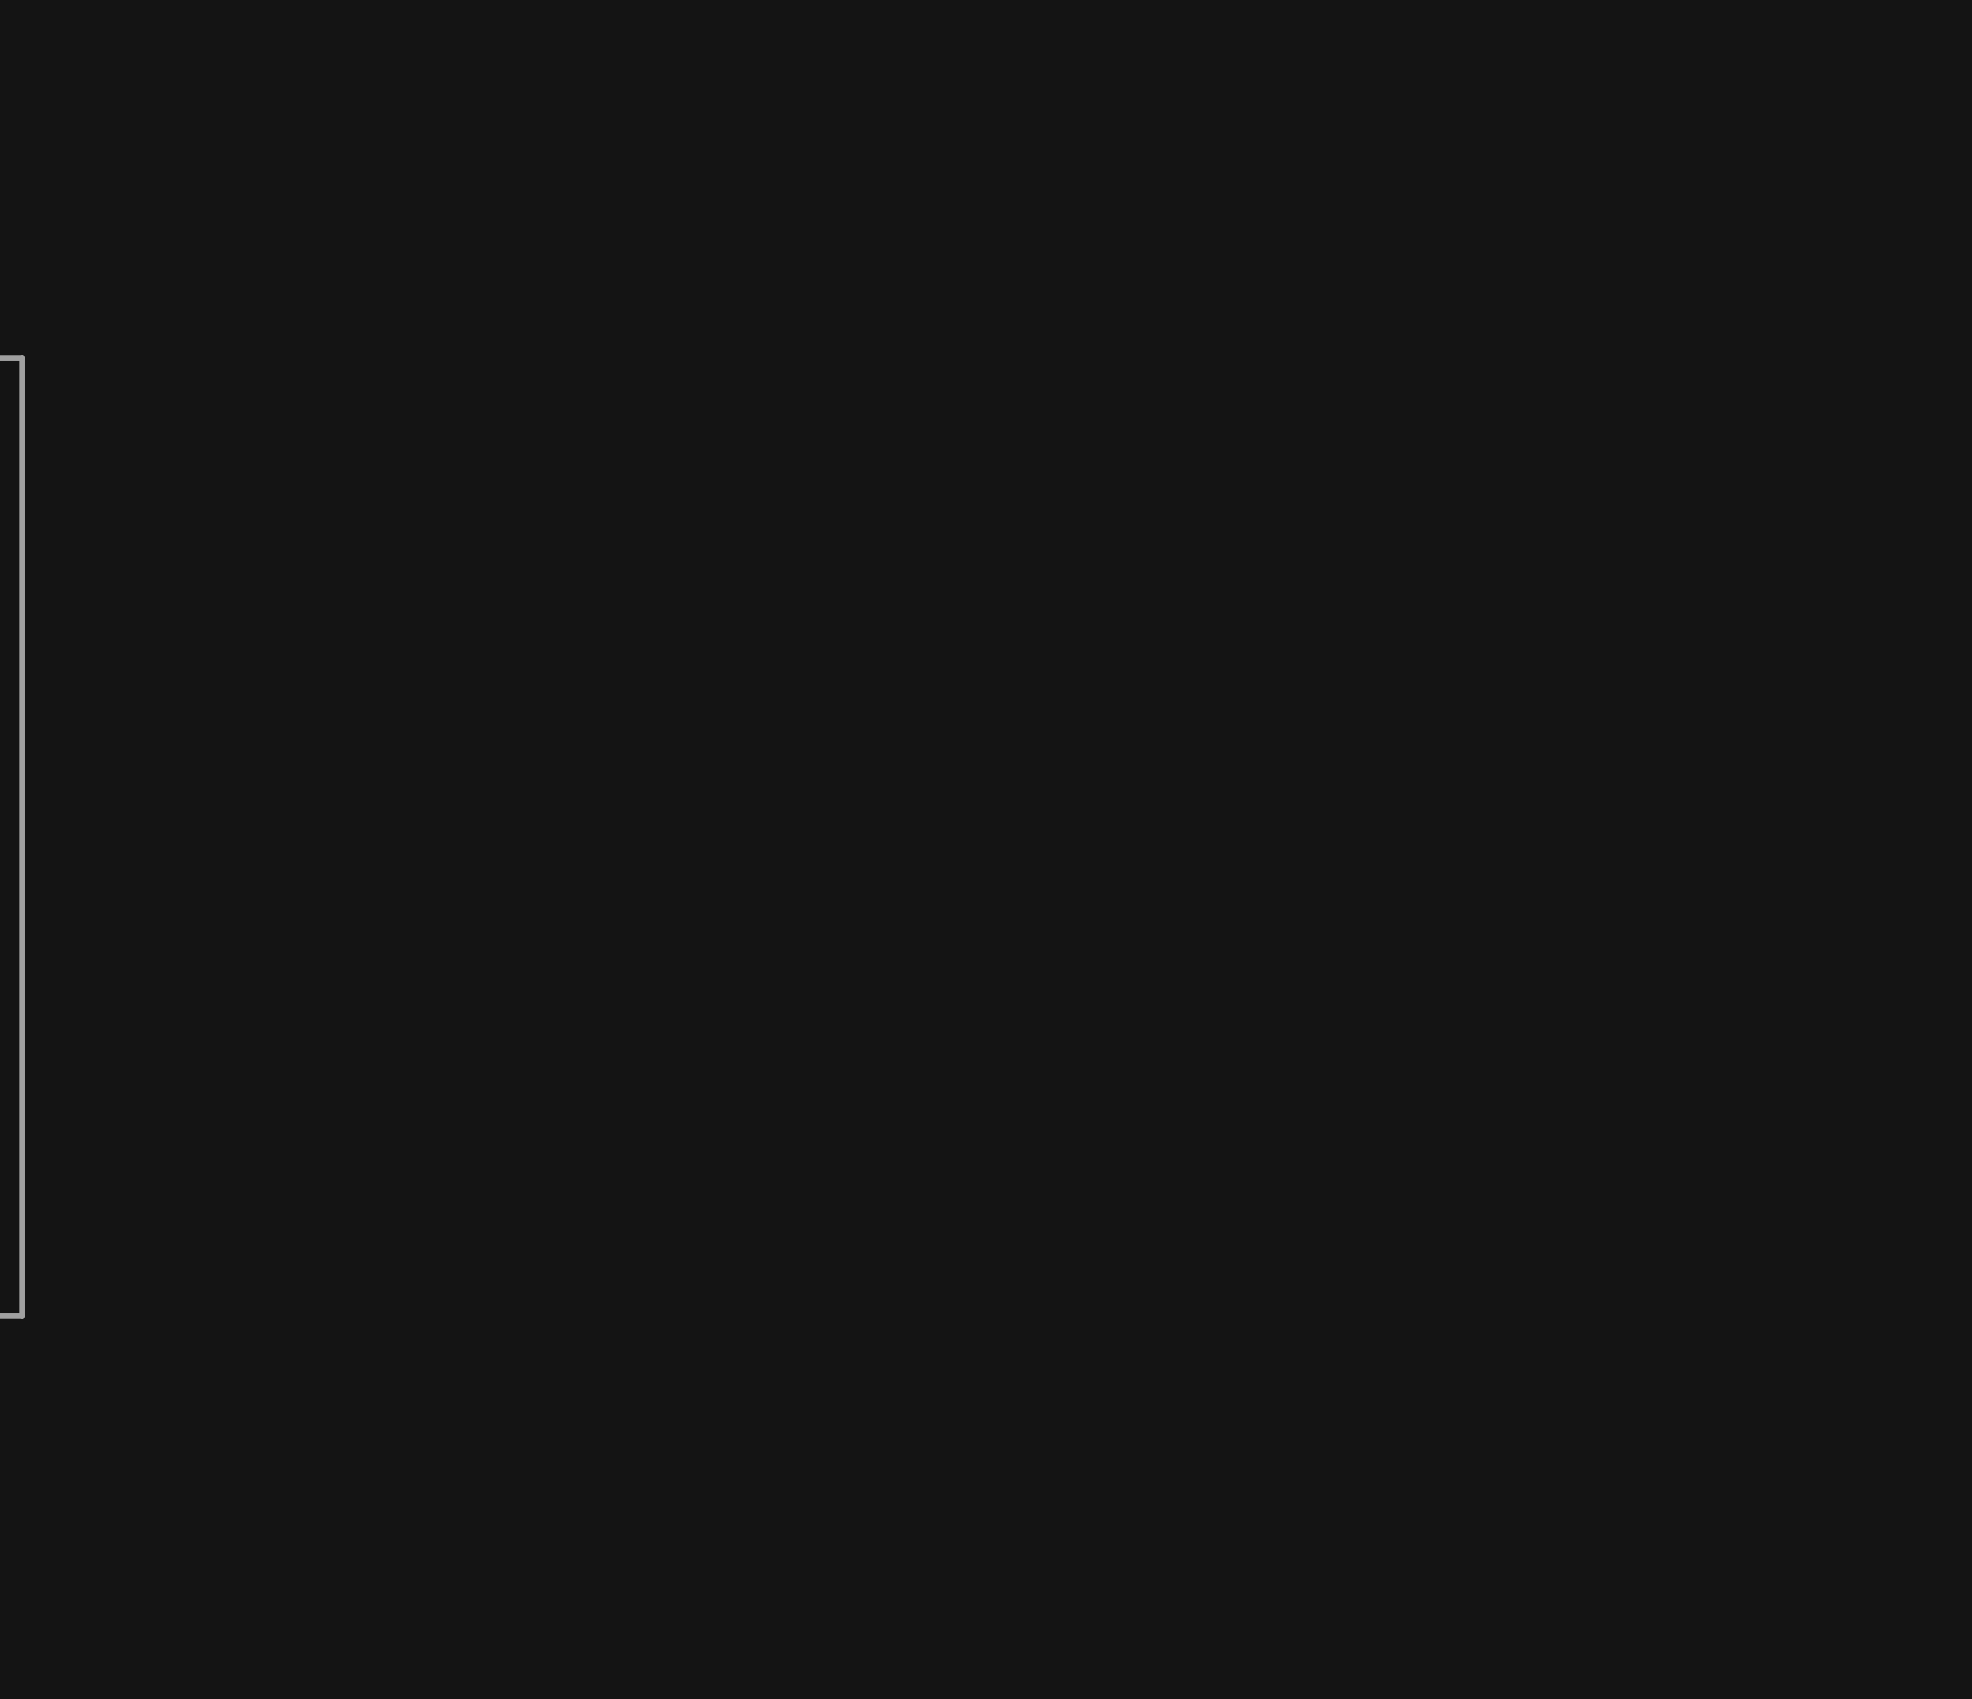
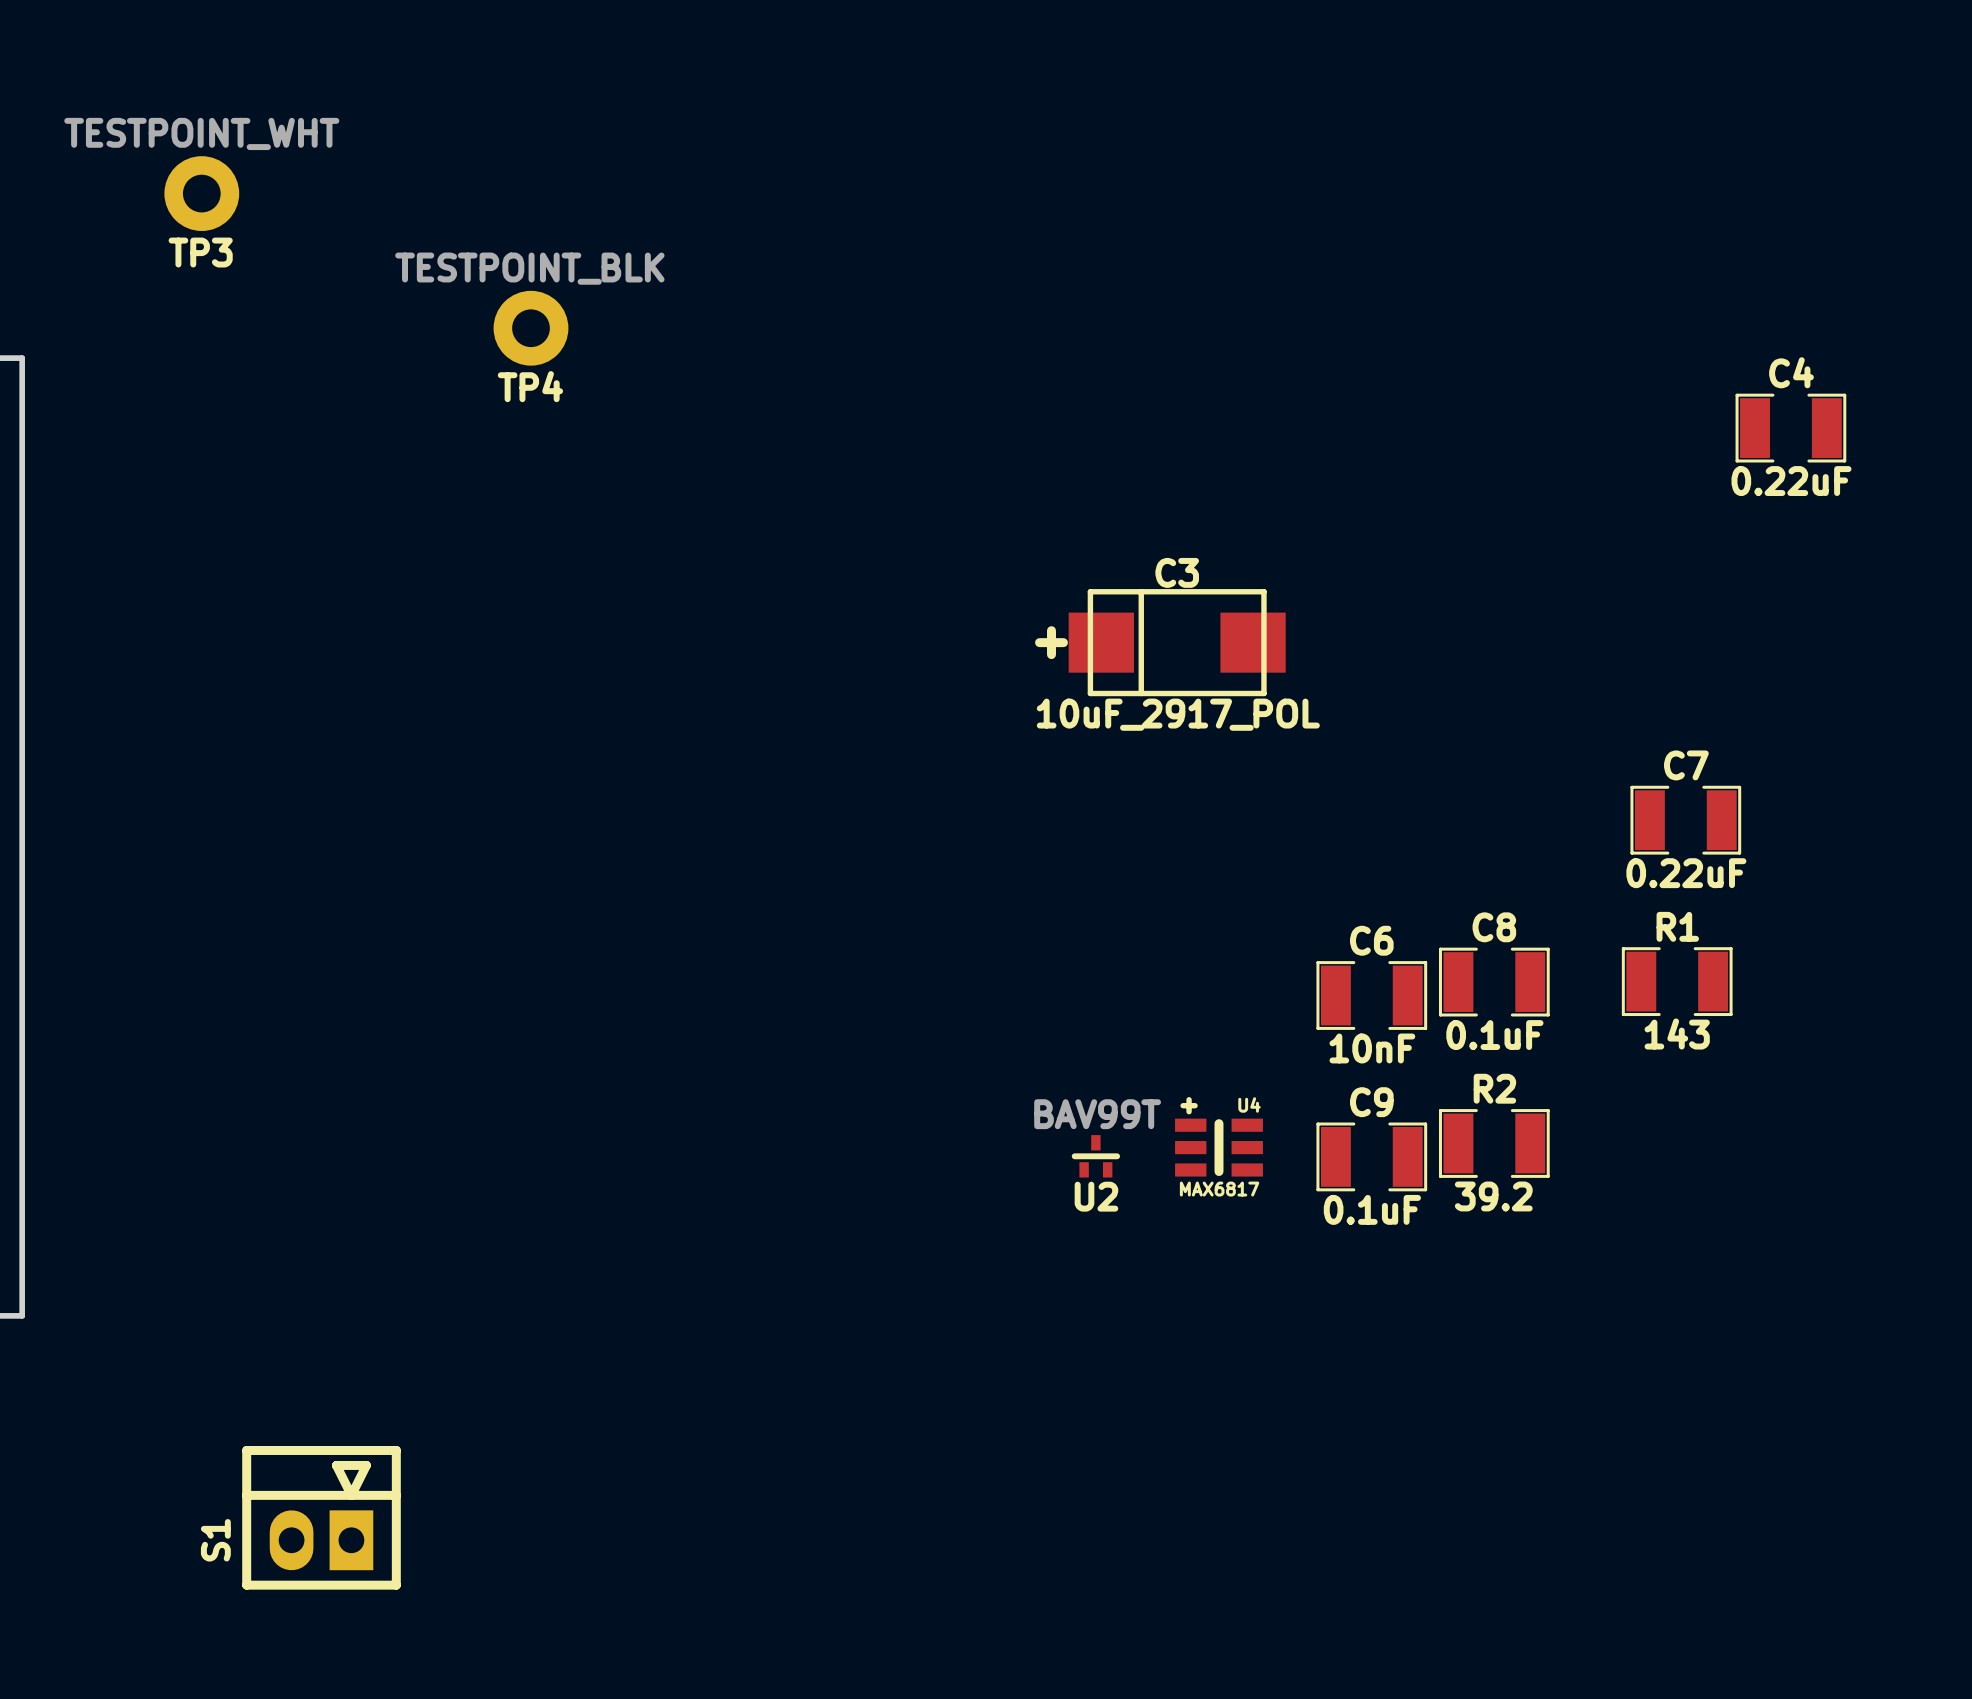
TP3: none -> TESTPOINT_WHT (201, 193)
TP4: none -> TESTPOINT_BLK (530, 328)
C4: none -> 0.22uF (1790, 428)
C3: none -> 10uF_2917_POL (1160, 642)
C7: none -> 0.22uF (1685, 820)
R1: none -> 143 (1677, 981)
C8: none -> 0.1uF (1494, 982)
C6: none -> 10nF (1371, 995)
U4: none -> MAX6817 (1218, 1136)
R2: none -> 39.2 (1494, 1143)
U2: none -> BAV99T (1095, 1156)
C9: none -> 0.1uF (1371, 1156)
S1: none -> (321, 1517)

